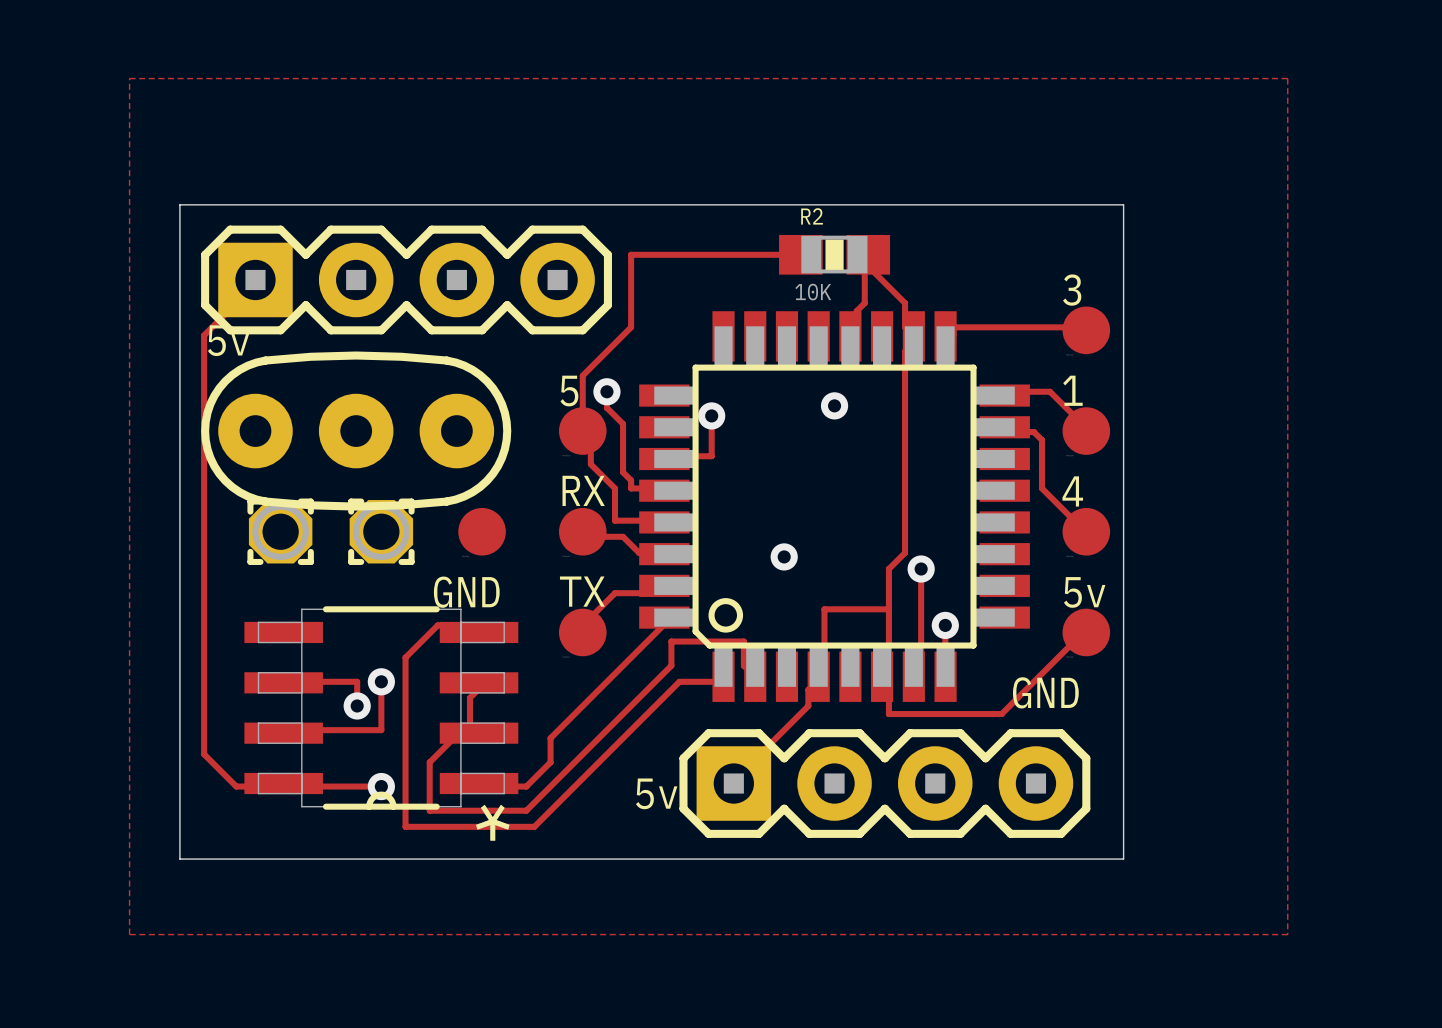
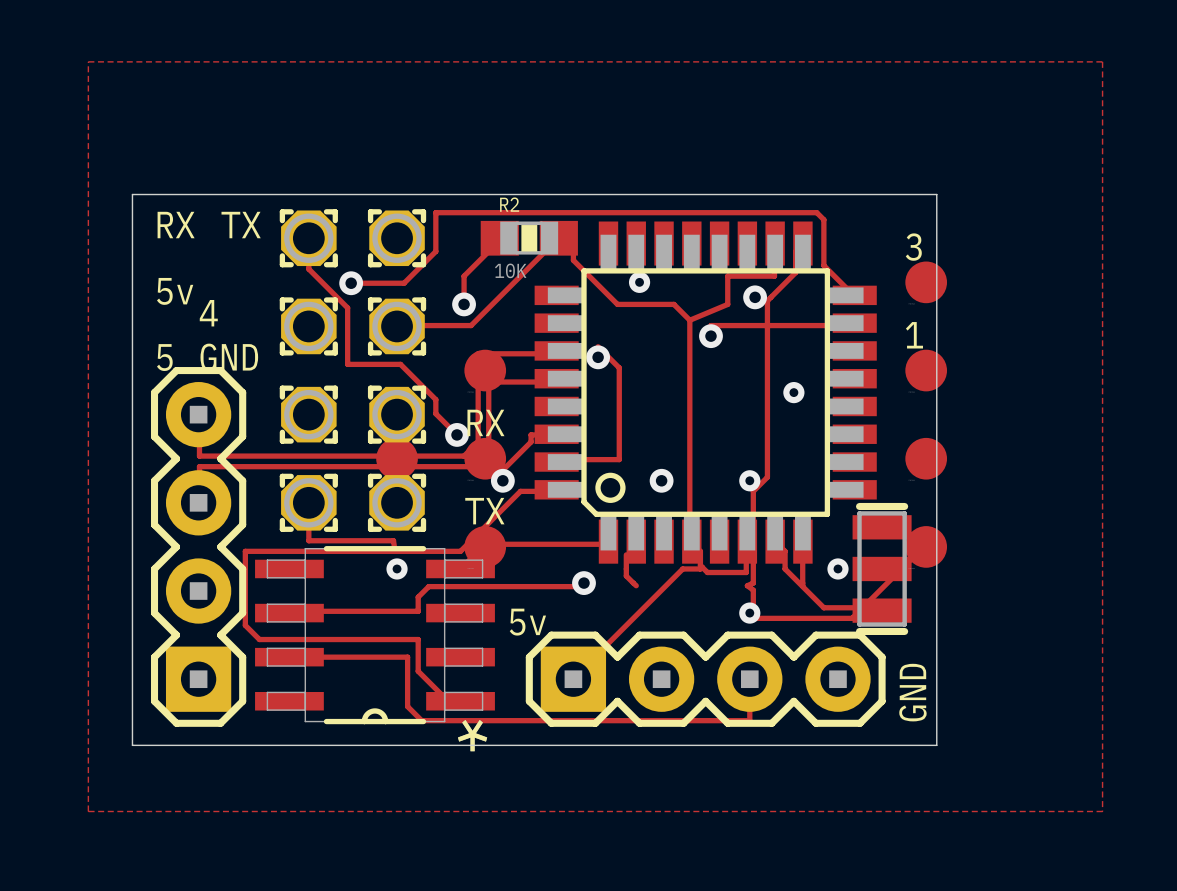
part footprint: [201, 225, 612, 335] -> [279, 209, 338, 268]
board edge: (179, 230) (179, 204) (1123, 204) (1123, 859) (1098, 859) -> (132, 194) (936, 194) (936, 745)
track: (800, 254) (631, 254) (631, 327) (582, 375) (582, 432) (590, 440) (590, 464) (615, 488) (615, 520) (663, 520) (664, 522) -> none
R2 position: (834, 254) -> (529, 238)
text: none -> RX (176, 225)
text: none -> TX (241, 225)
track: (255, 279) (252, 287) (204, 335) (204, 754) (236, 786) (276, 786) (283, 783) (284, 786) (381, 786) -> none
track: none -> (308, 238) (308, 269) (347, 307) (347, 364) (400, 364) (435, 399) (435, 413) (457, 434)
part: none -> (397, 238)
track: none -> (499, 238) (464, 276) (464, 304)
track: none -> (775, 243) (774, 276) (727, 276) (727, 304) (689, 320)
via: none -> (639, 282)
track: (1086, 330) (1082, 327) (953, 327) (953, 335) (945, 336) -> none
track: none -> (351, 283) (404, 283) (435, 251) (435, 212) (816, 212) (823, 219) (823, 265) (854, 295)
via: none -> (351, 283)
track: (850, 336) (856, 335) (856, 311) (864, 303) (864, 254) (868, 254) (864, 262) (905, 303) (905, 327) (913, 336) (913, 343) -> (802, 243) (795, 251) (795, 272) (774, 293)
via: none -> (755, 297)
track: none -> (689, 320) (689, 540) (700, 551) (700, 565) (707, 572) (746, 572) (747, 541)
track: none -> (689, 320) (673, 304) (617, 304) (573, 260) (573, 252) (558, 238) (471, 325) (397, 326)
track: none -> (854, 323) (852, 325) (710, 325) (710, 336)
part: none -> (308, 326)
part: none -> (397, 326)
text position: 5 (569, 391) -> 5 (164, 357)
track: (606, 391) (606, 407) (623, 424) (623, 472) (631, 480) (631, 488) (663, 488) (664, 490) -> none
via position: (606, 391) -> (464, 304)
track: (1004, 395) (1009, 391) (1050, 391) (1082, 424) (1086, 431) -> none
track: none -> (598, 346) (619, 367) (619, 459) (559, 459) (556, 462)
via position: (834, 405) -> (710, 336)
track: none -> (556, 350) (555, 353) (478, 353) (478, 441) (464, 456) (199, 456) (198, 414)
track: (711, 415) (711, 456) (671, 456) (664, 459) -> none
track: (1004, 427) (1009, 432) (1033, 432) (1042, 440) (1042, 488) (1086, 531) -> none
part: (356, 431) -> none
track: none -> (556, 378) (555, 382) (488, 382) (488, 449) (471, 466) (199, 466) (198, 502)
via: none -> (793, 392)
part: none -> (308, 414)
part: none -> (397, 414)
text position: 4 (1072, 491) -> 4 (208, 313)
track: none -> (556, 434) (531, 434) (531, 441) (502, 470) (502, 480)
via: none -> (457, 434)
part position: (834, 506) -> (705, 392)
part: (280, 531) -> none
part: (381, 531) -> none
track: (582, 531) (582, 536) (623, 536) (639, 552) (664, 554) -> none
via: none -> (502, 480)
via: none -> (749, 480)
track: (921, 569) (921, 673) (913, 676) -> none
via: (921, 569) -> none
part: none -> (308, 502)
part: none -> (397, 502)
track: (664, 585) (663, 593) (615, 593) (582, 625) (582, 632) -> none
text position: GND (466, 592) -> GND (229, 357)
text: 5v (1084, 592) -> none
track: (888, 609) (824, 609) (824, 673) (818, 676) (808, 689) (808, 705) (735, 778) (733, 783) -> none
track: (664, 617) (663, 625) (550, 738) (550, 762) (526, 786) (486, 786) (479, 783) -> none
track: (437, 625) (405, 657) (405, 826) (534, 826) (679, 681) (719, 681) (723, 676) -> (358, 540) (308, 540) (308, 502)
via: (945, 625) -> none
track: none -> (608, 541) (605, 544) (485, 544) (460, 568)
track: none -> (775, 541) (785, 551) (785, 568) (823, 607) (880, 607) (882, 610)
part: none -> (198, 546)
track: (743, 641) (671, 641) (671, 665) (526, 810) (429, 810) (429, 762) (453, 738) -> (556, 489) (555, 491) (520, 491) (460, 551) (245, 551) (245, 625) (259, 639) (372, 639)
track: none -> (702, 567) (700, 568) (682, 568) (573, 679)
via: none -> (397, 568)
via: none -> (837, 568)
part: none -> (882, 568)
track: none -> (584, 583) (584, 586) (428, 586) (418, 597) (418, 611) (291, 611) (289, 613)
via: none -> (584, 583)
track: (381, 681) (381, 730) (284, 730) (283, 733) -> none
via: (381, 681) -> none
track: (283, 682) (357, 681) (357, 705) -> none
track: (479, 682) (478, 689) (469, 697) (469, 738) (479, 733) (478, 738) -> (460, 701) (460, 699) (446, 699) (418, 671) (418, 639) (393, 639)
text rotation: 0° (1045, 692) -> 90° counterclockwise (912, 692)
via: (357, 705) -> none
part position: (381, 707) -> (374, 635)
via: none -> (749, 613)
track: none -> (289, 657) (407, 657) (407, 706) (421, 720) (749, 720) (749, 679)
part position: (884, 783) -> (705, 679)
via: (381, 786) -> none
text position: 5v (656, 793) -> 5v (527, 622)

